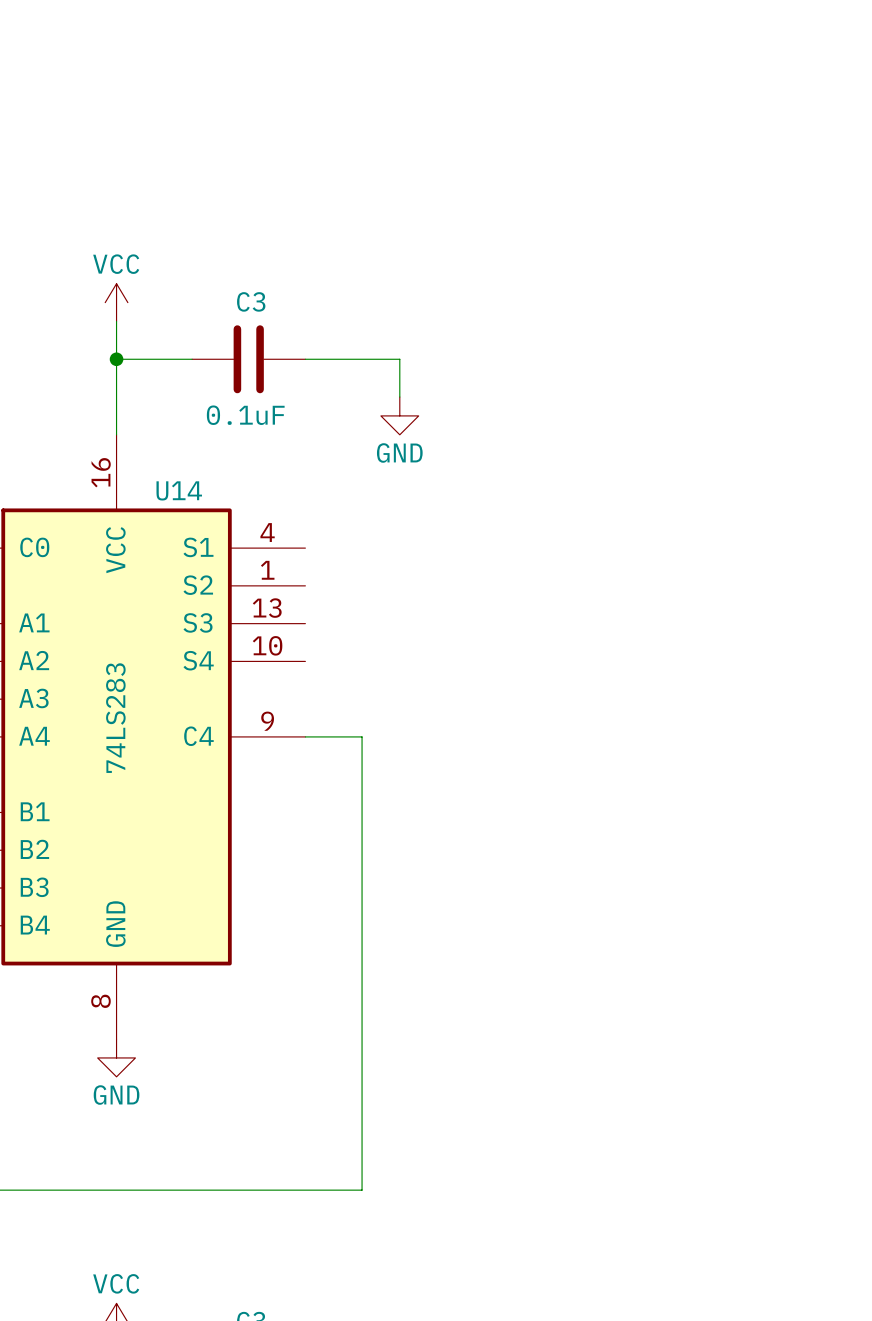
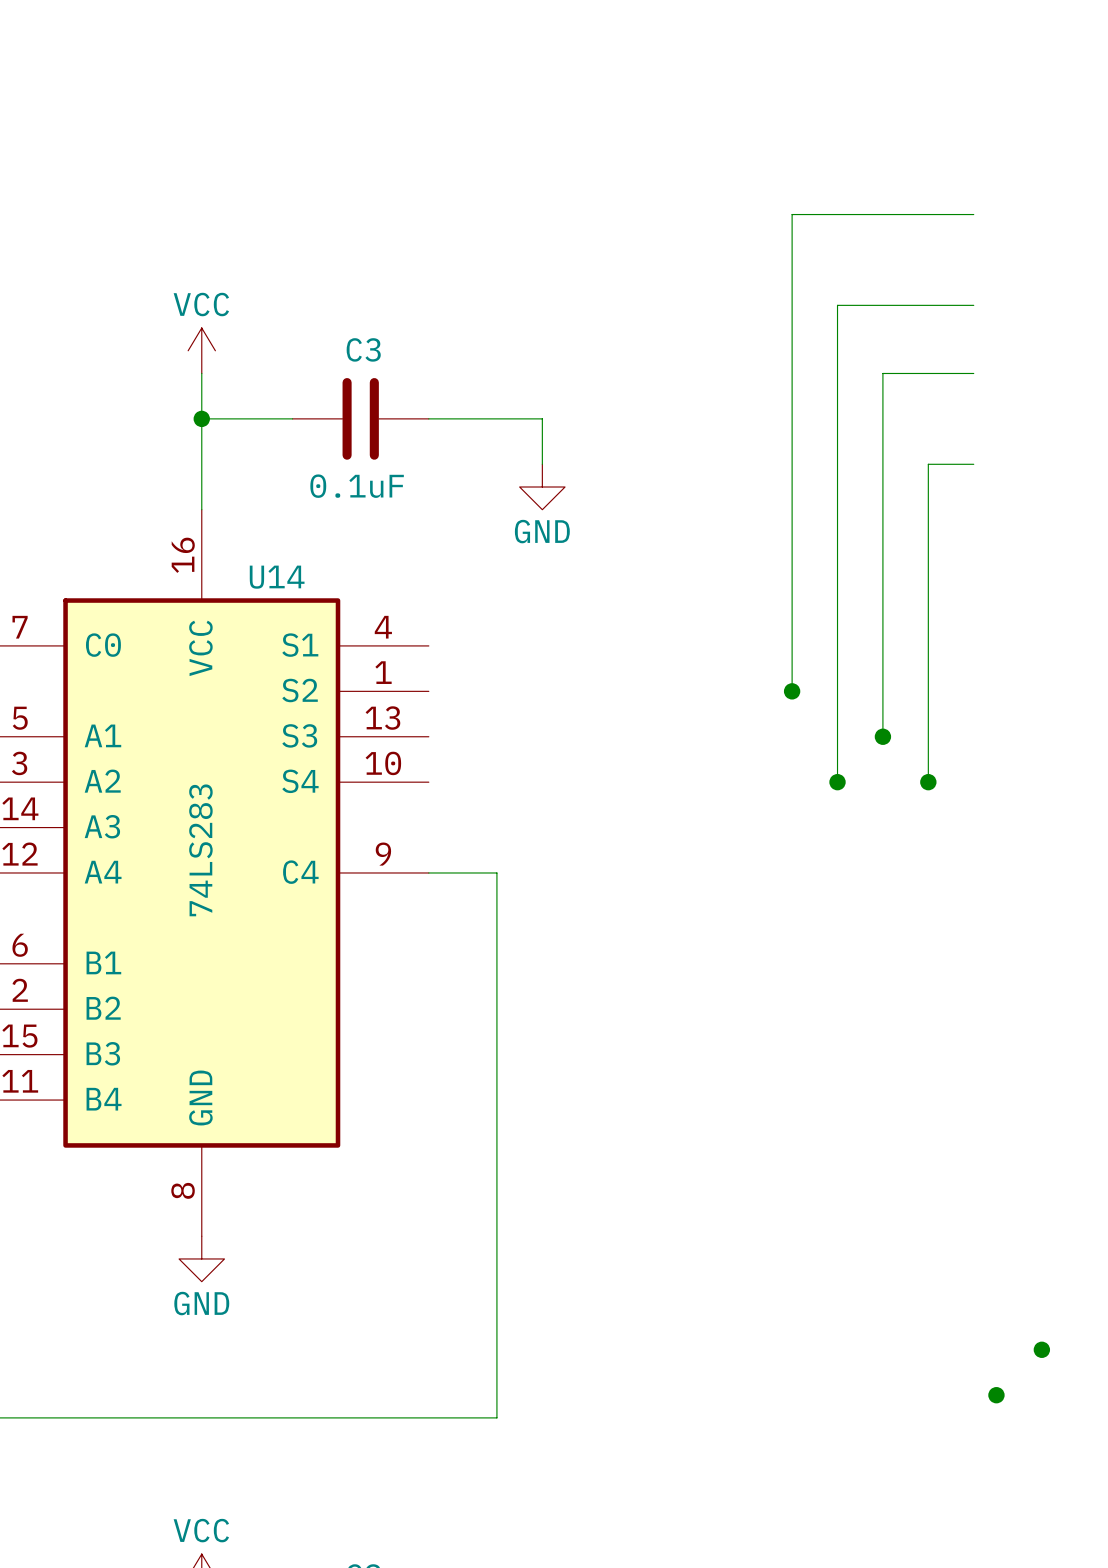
wire: none -> (973, 214) (792, 214) (792, 691)
wire: none -> (973, 305) (837, 305) (837, 782)
wire: none -> (973, 373) (882, 373) (882, 736)
wire: none -> (973, 464) (928, 464) (928, 782)
junction: none -> (792, 691)
junction: none -> (882, 736)
junction: none -> (837, 782)
junction: none -> (928, 782)
junction: none -> (1041, 1349)
junction: none -> (996, 1395)

